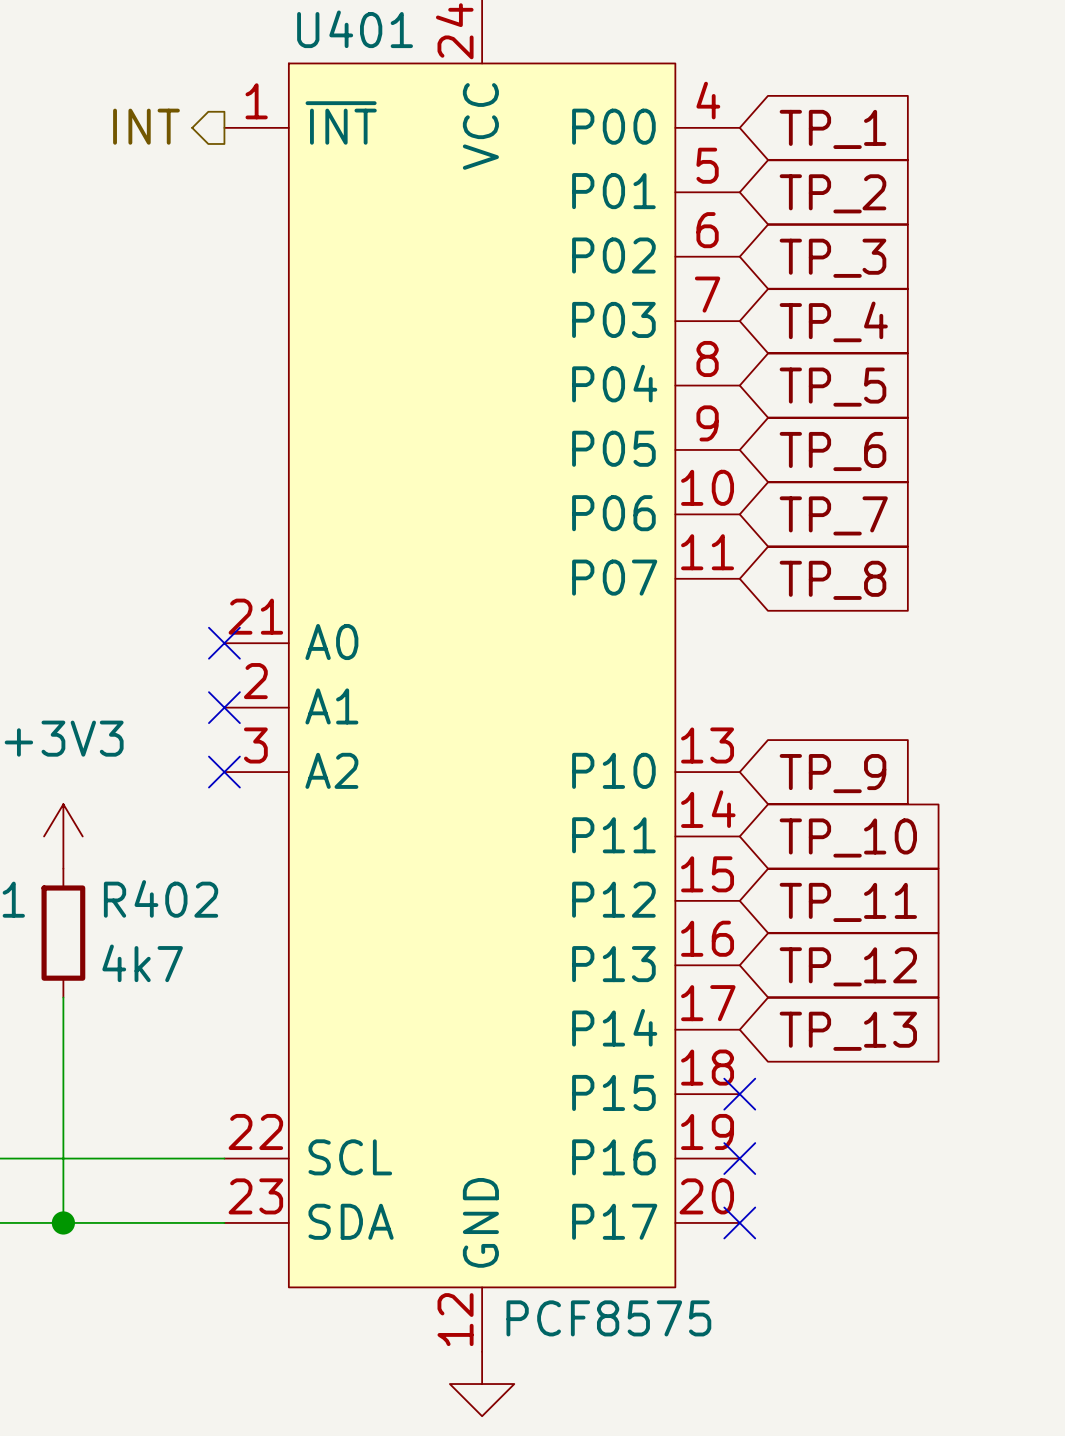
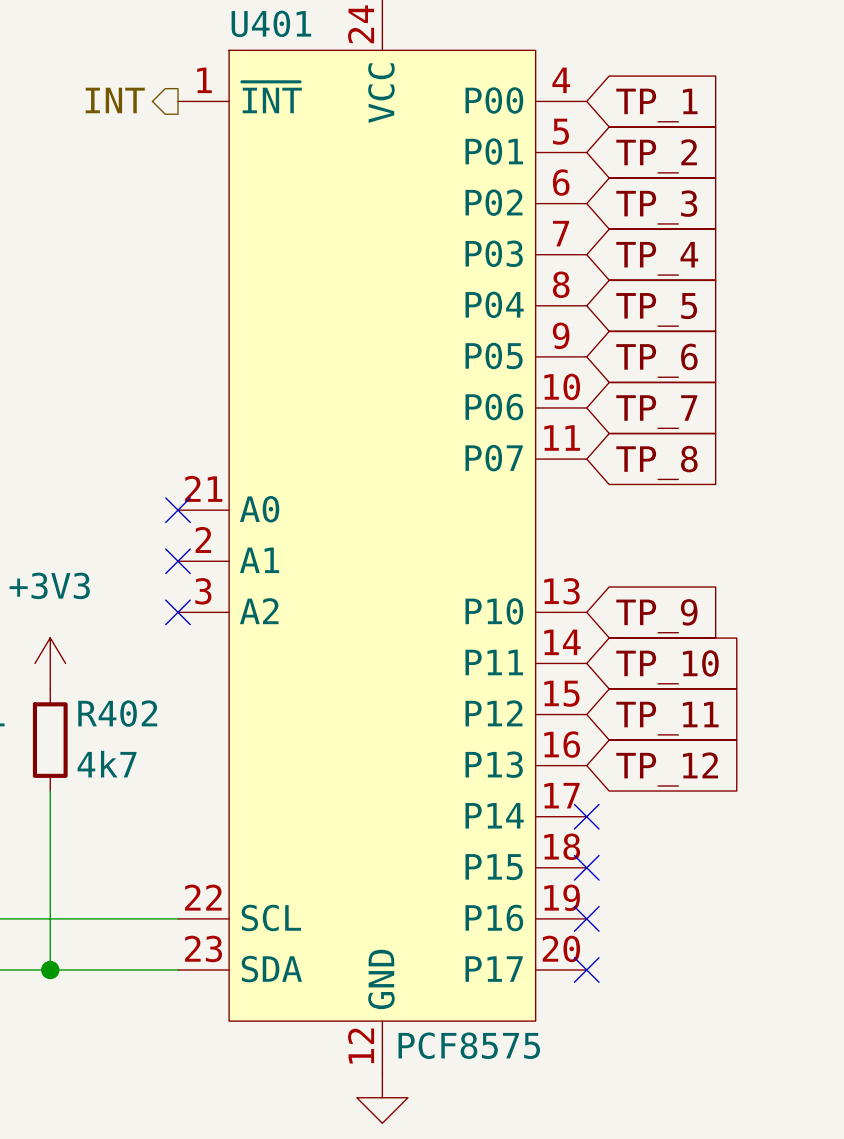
no-connect mark: none -> (586, 816)
global label: TP_13 (848, 1031) -> none

